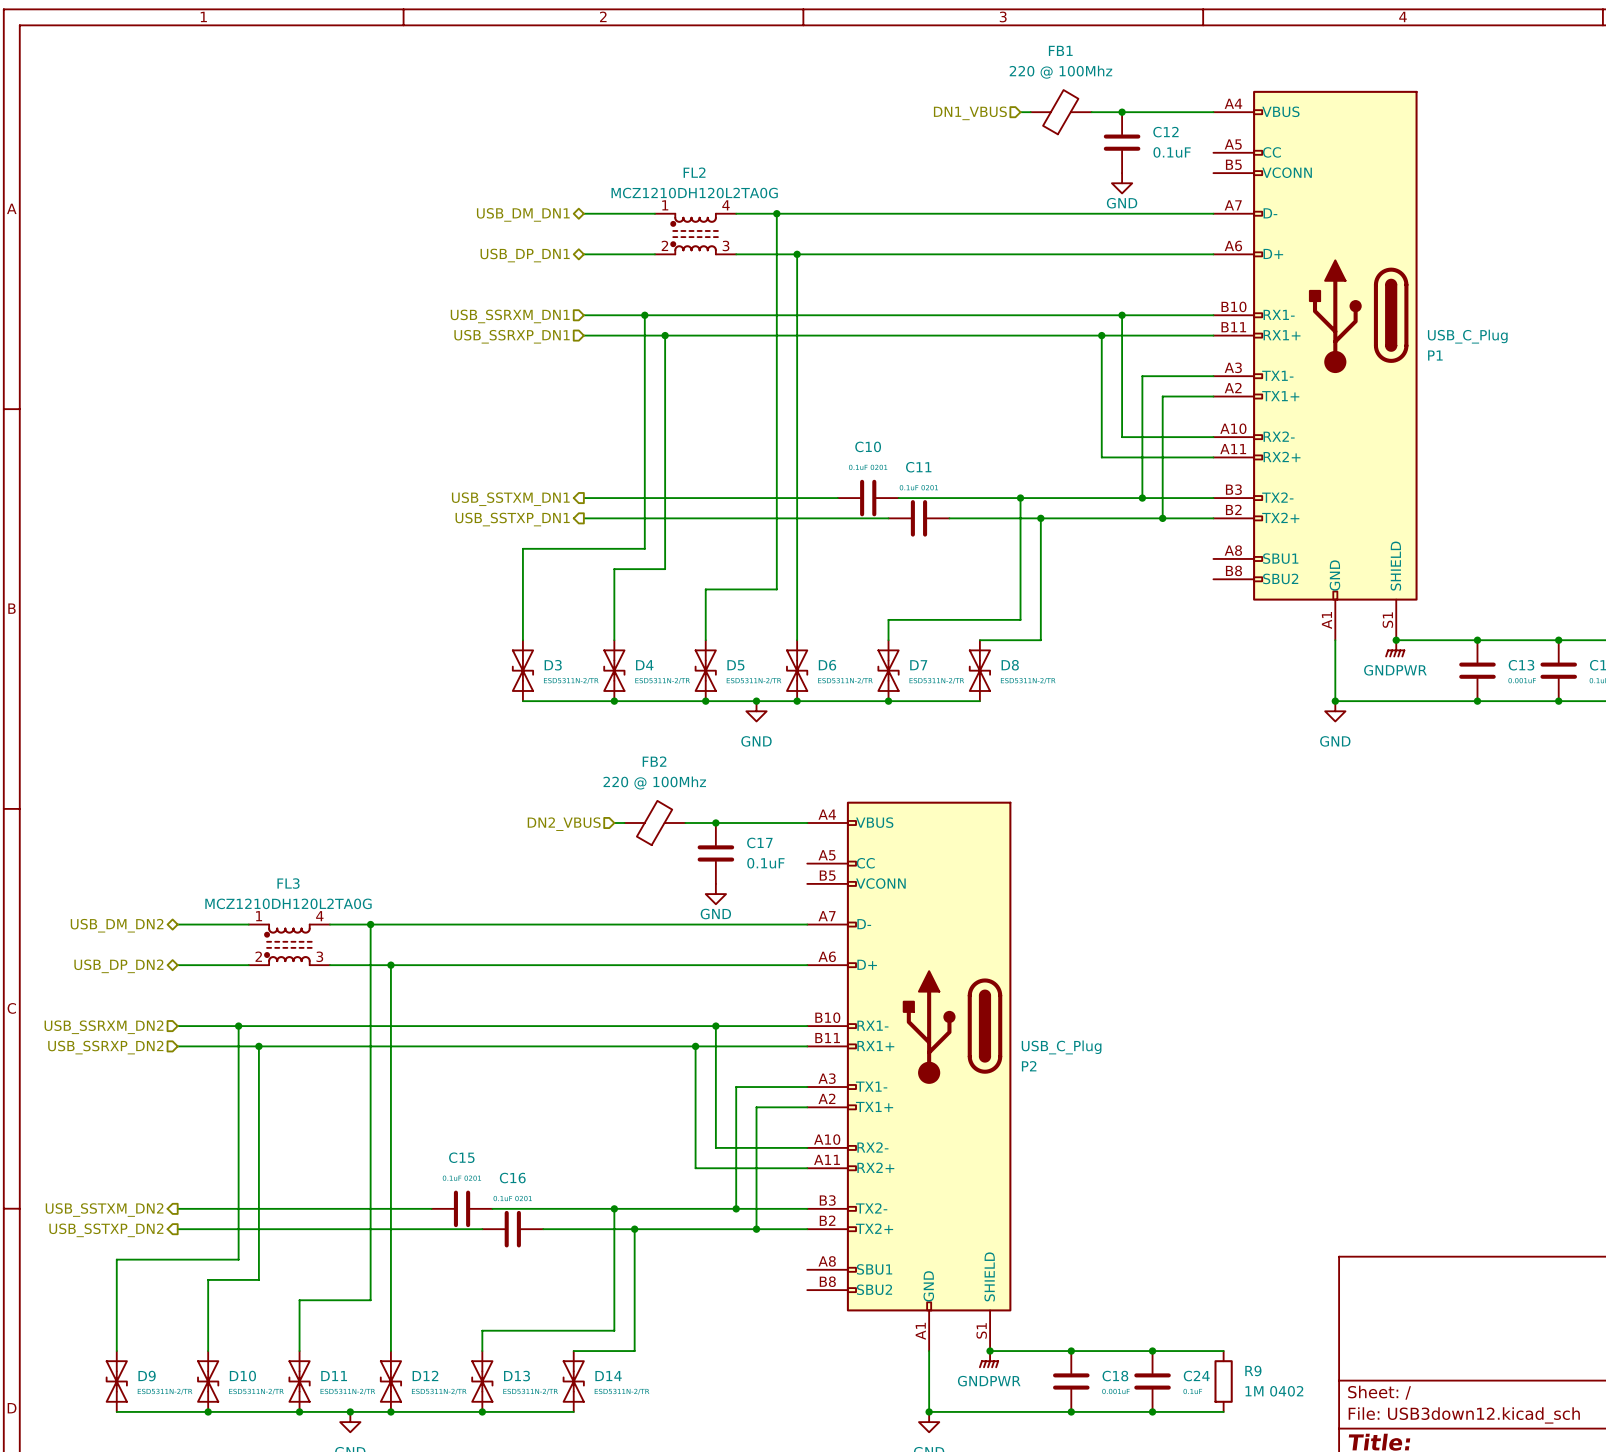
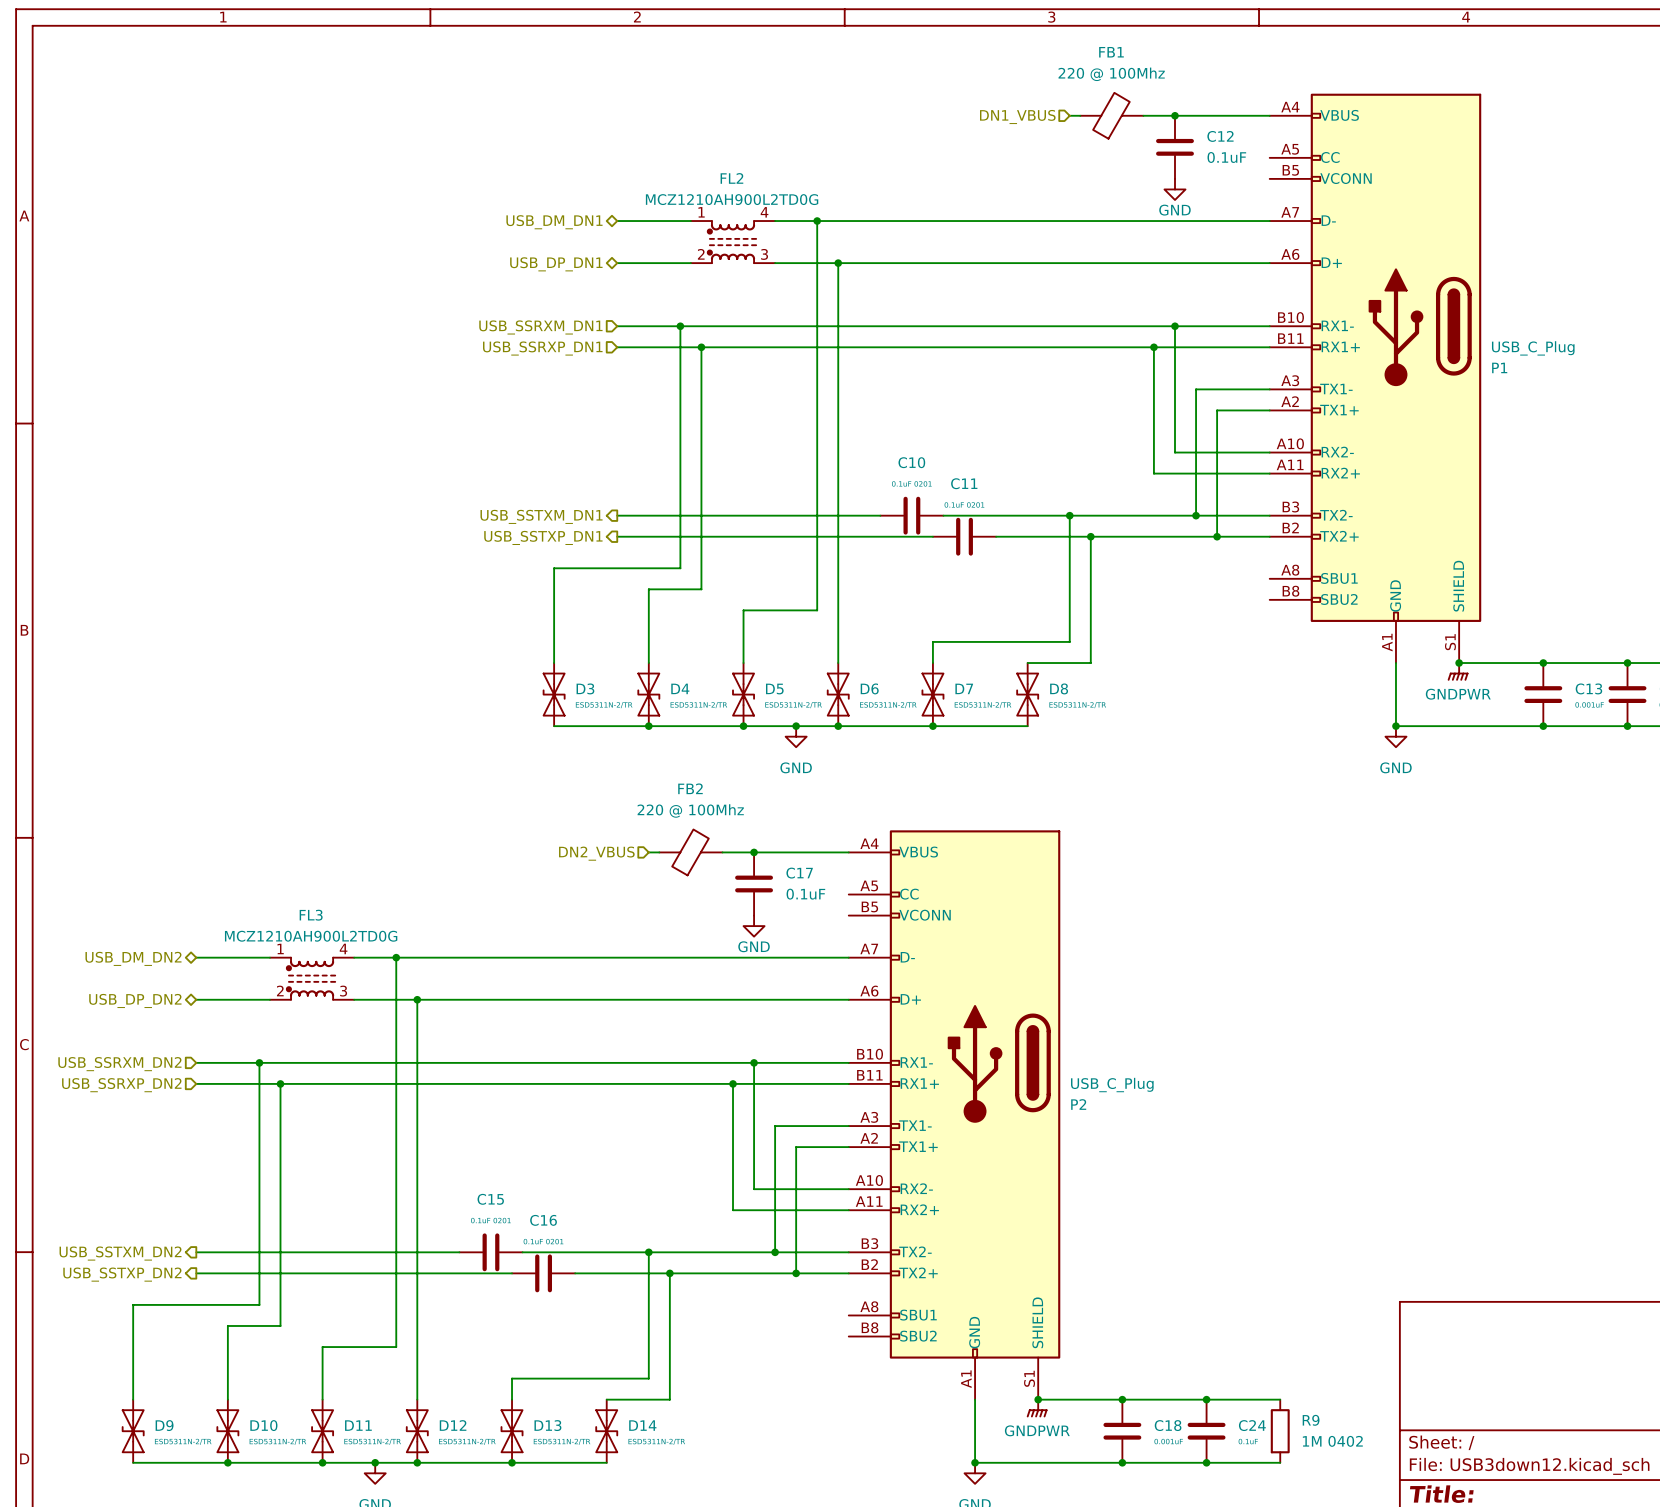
FL2 value: MCZ1210DH120L2TA0G (694, 193) -> MCZ1210AH900L2TD0G (732, 199)
FL3 value: MCZ1210DH120L2TA0G (288, 903) -> MCZ1210AH900L2TD0G (311, 936)

